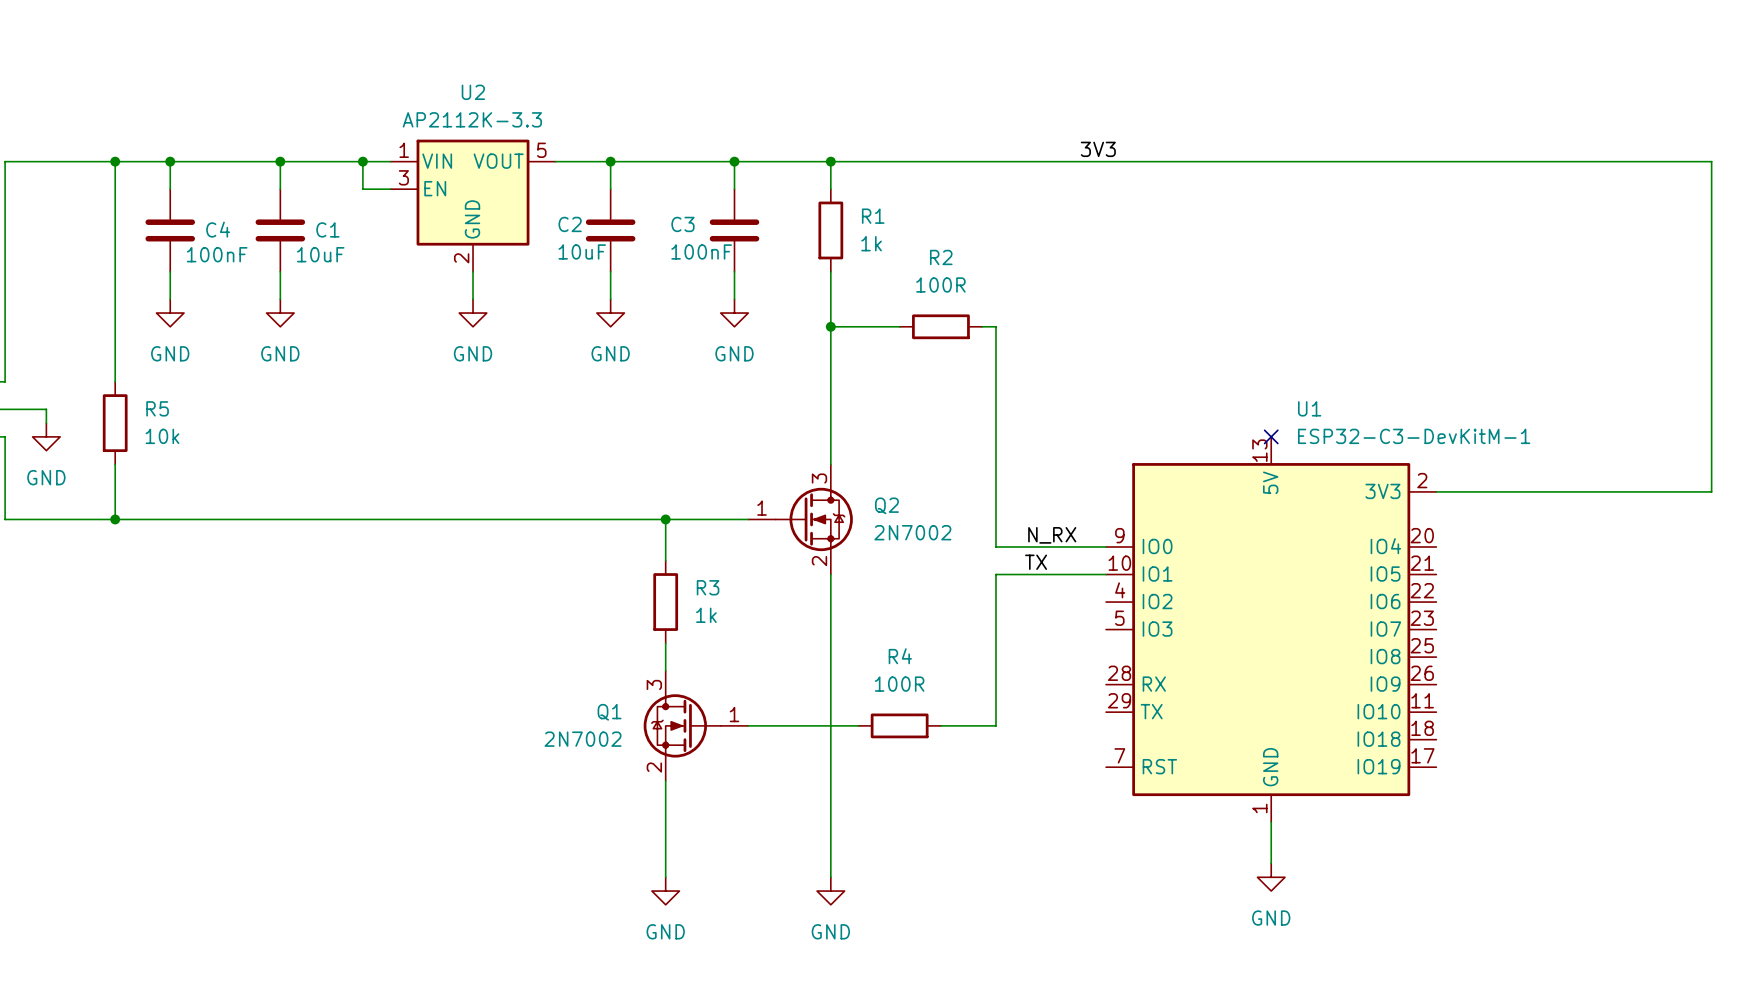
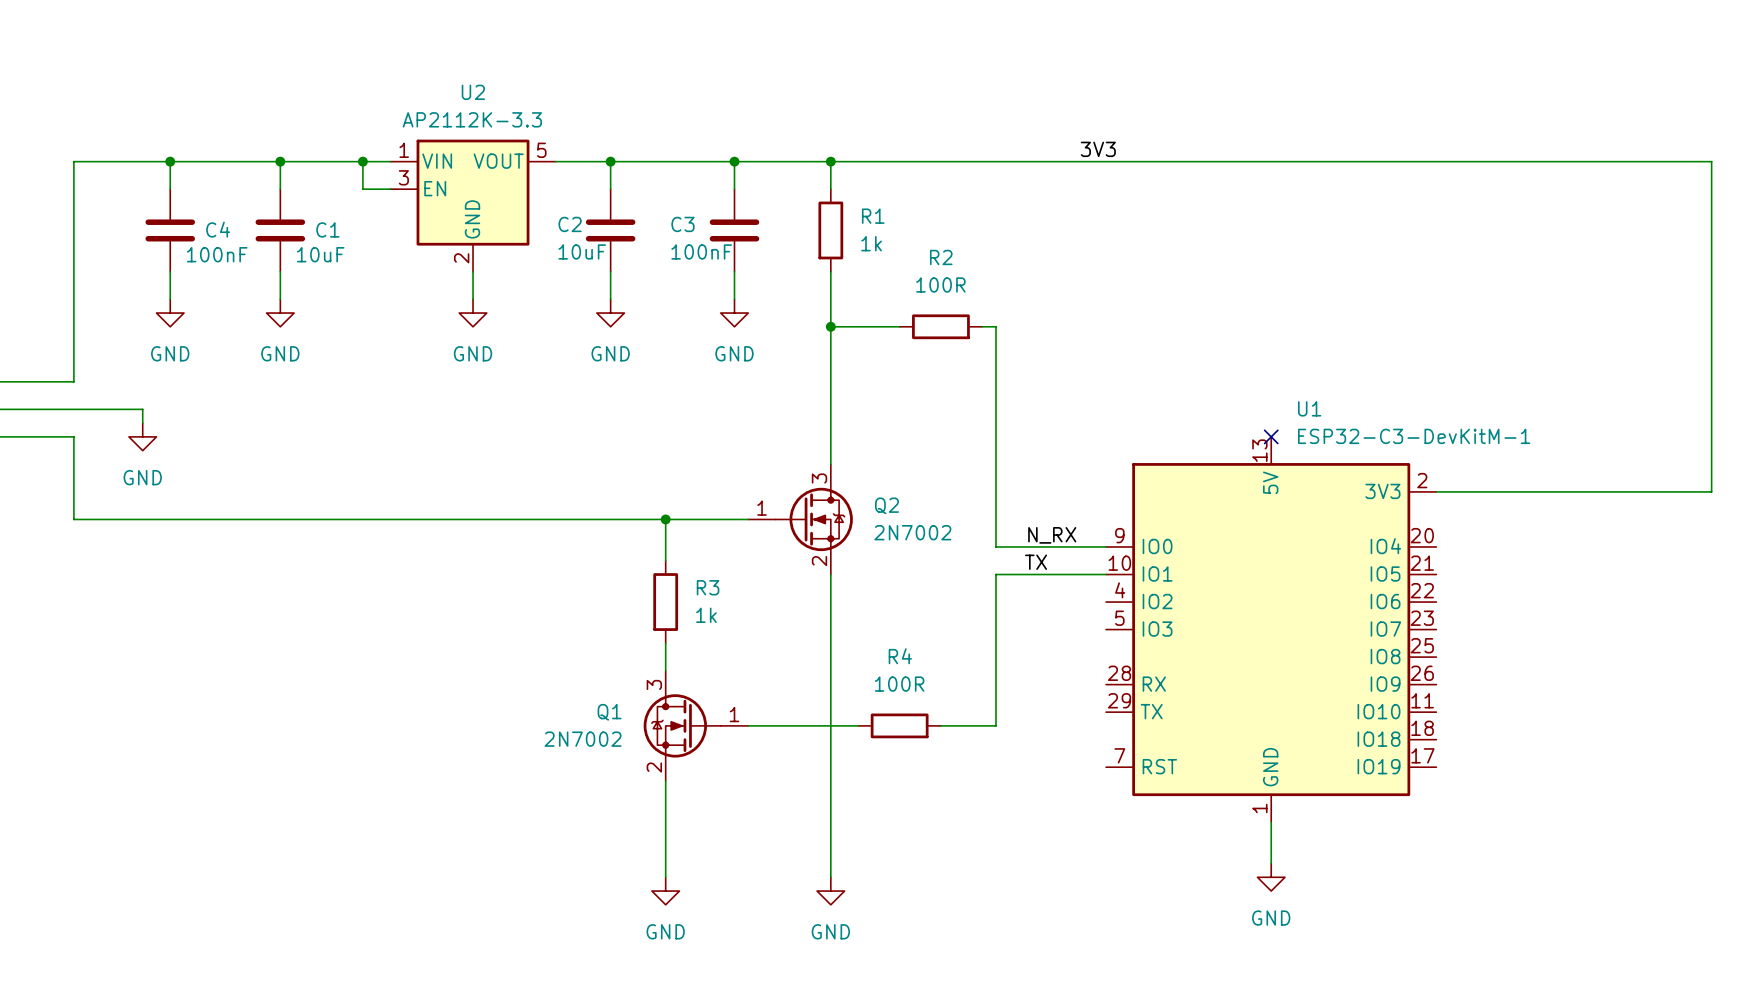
wire: (73, 161) (5, 161) (5, 381) -> (73, 161) (73, 381) (5, 381)
wire: (115, 161) (115, 381) -> none
junction: (115, 161) -> none
wire: (46, 409) (46, 423) -> (46, 409) (142, 409) (142, 423)
R5: 10k (115, 423) -> none
wire: (5, 436) (5, 519) (73, 519) -> (5, 436) (73, 436) (73, 519)
power symbol position: GND (46, 436) -> GND (142, 436)
wire: (115, 464) (115, 519) -> none
junction: (115, 519) -> none

